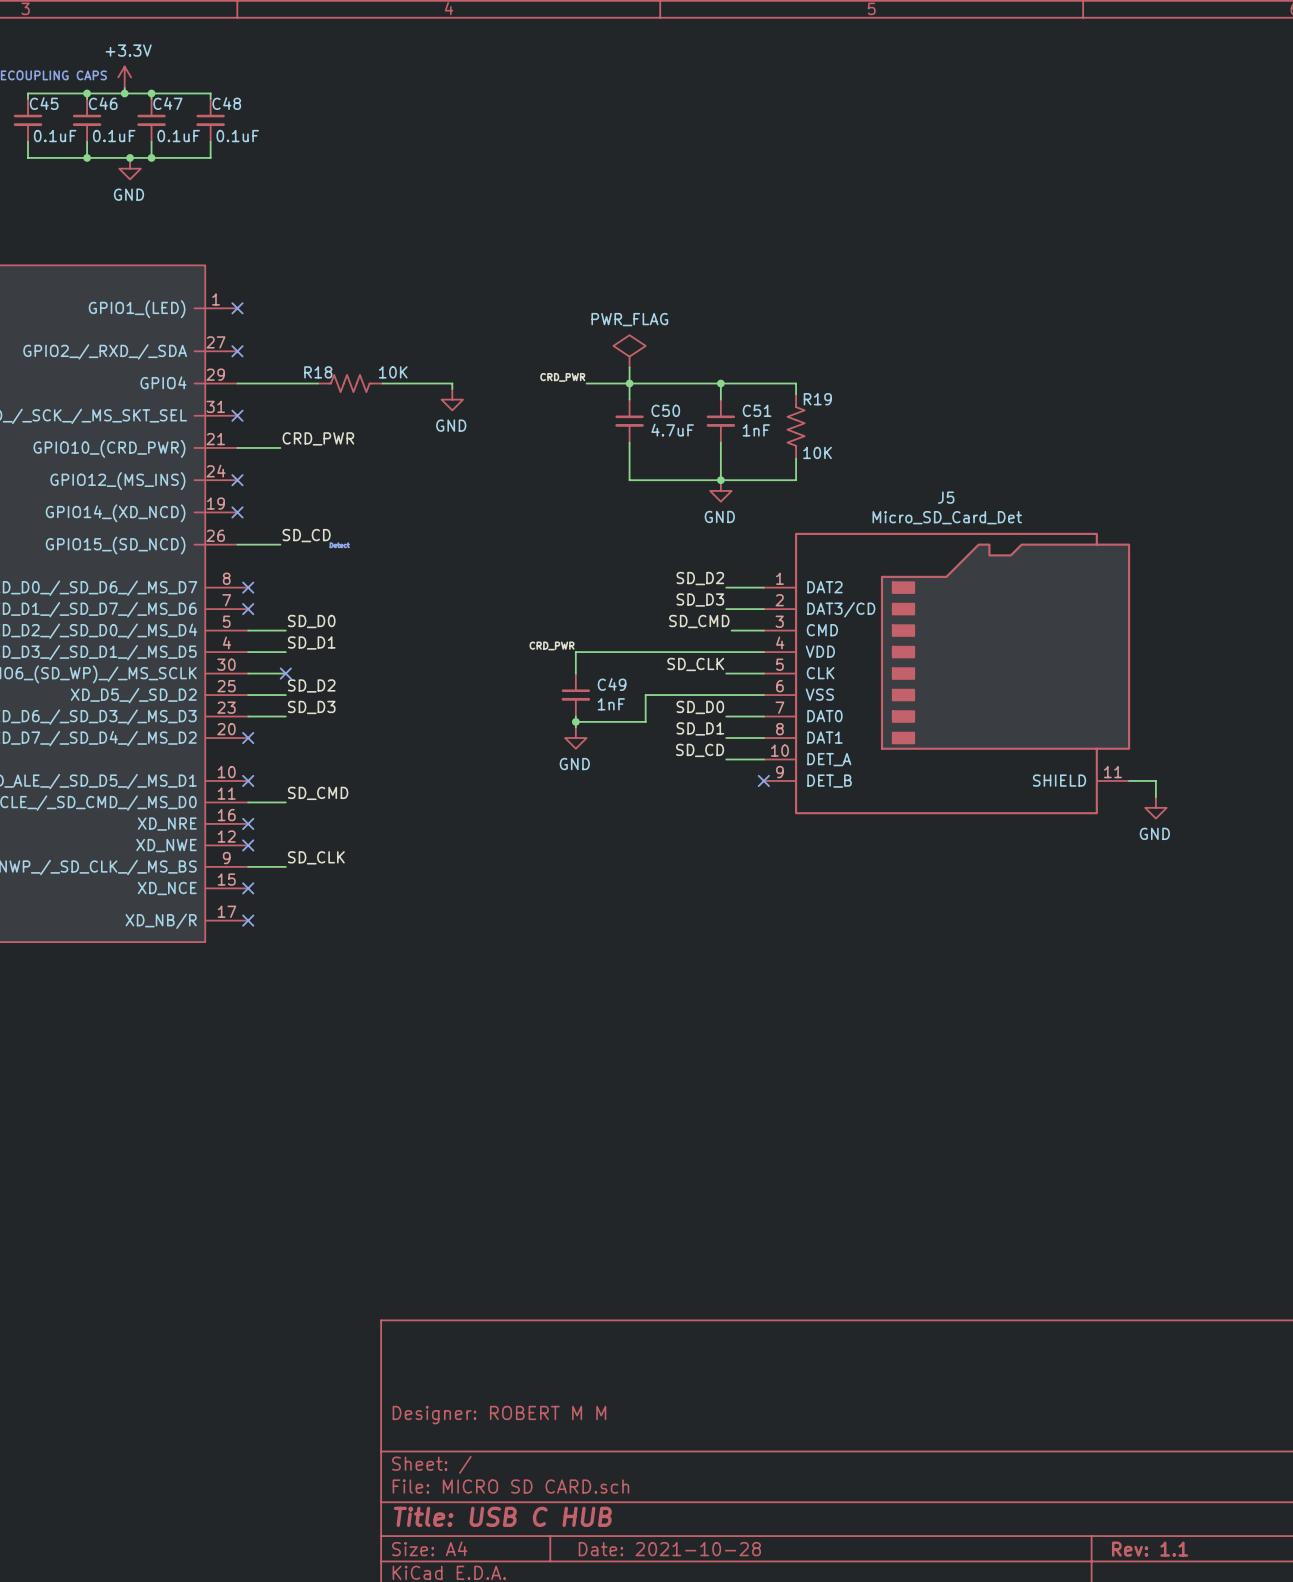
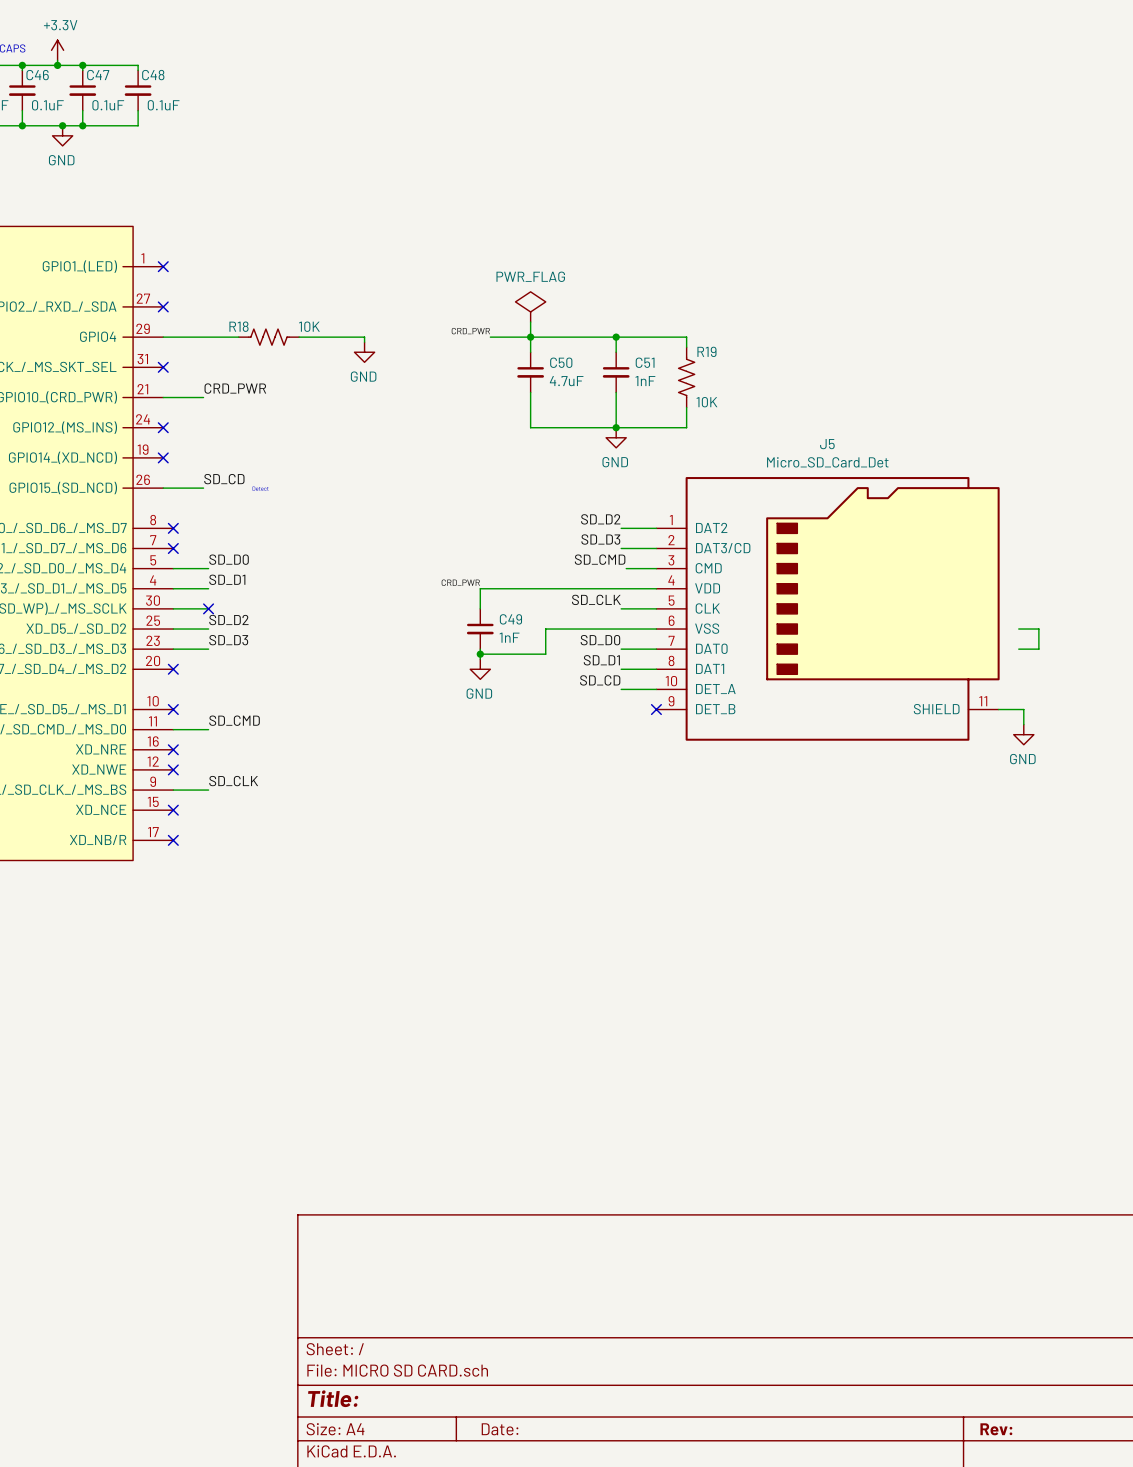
wire: none -> (1018, 629) (1038, 629) (1038, 649) (1018, 649)
title block: Designer: ROBERT M M (499, 1415) -> none
title block: Title: USB C HUB (502, 1516) -> Title: (333, 1398)
title block: Date: 2021-10-28 (669, 1549) -> Date: (500, 1429)
title block: Rev: 1.1 (1150, 1549) -> Rev: (996, 1429)

